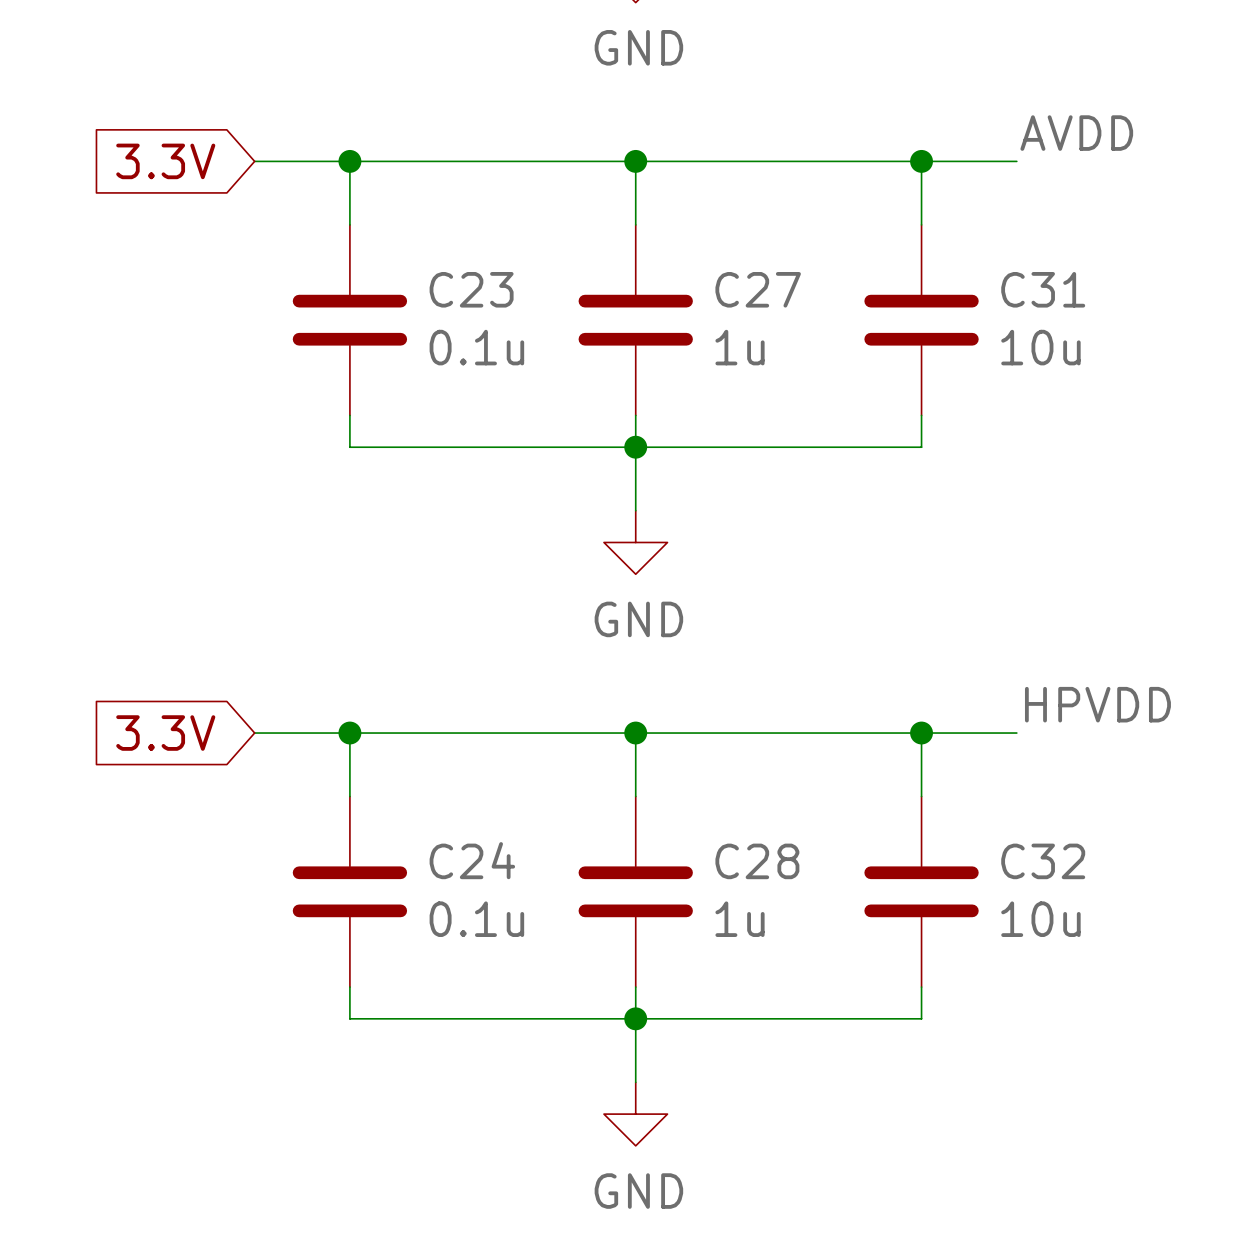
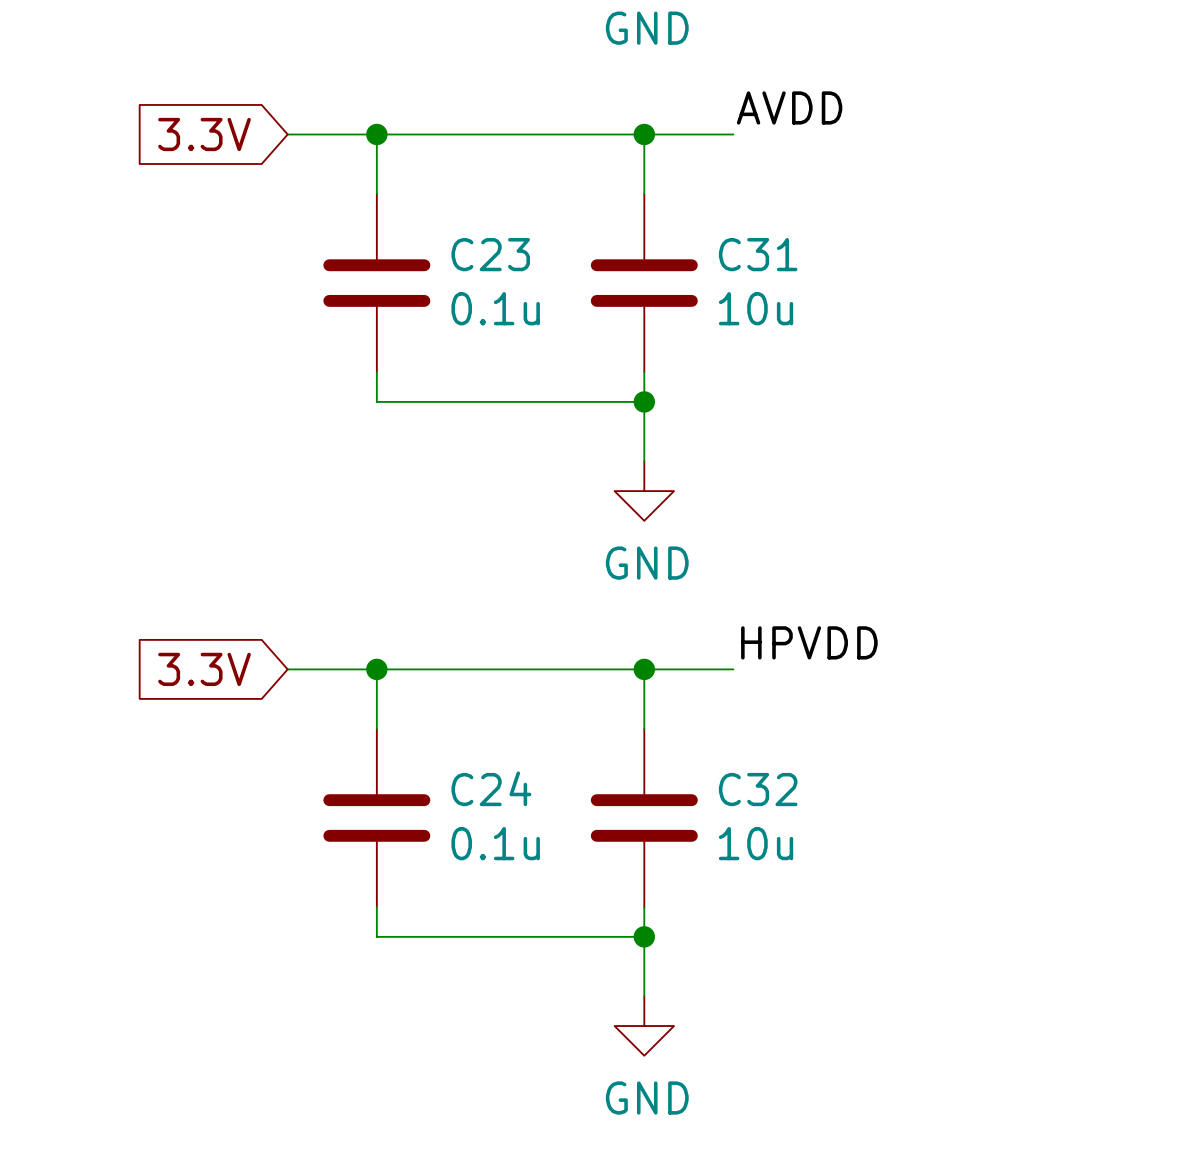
label position: AVDD (1076, 133) -> AVDD (789, 107)
wire: (731, 161) (1016, 161) -> none
wire: (921, 161) (921, 224) -> none
junction: (921, 161) -> none
C27 name: C27 (758, 289) -> C31 (758, 254)
C31: 10u (921, 320) -> none
C27 value: 1u (740, 347) -> 10u (756, 308)
wire: (921, 415) (921, 447) (635, 447) -> none
label position: HPVDD (1097, 704) -> HPVDD (809, 642)
wire: (731, 733) (1016, 733) -> none
wire: (921, 733) (921, 796) -> none
junction: (921, 733) -> none
C28 name: C28 (757, 861) -> C32 (758, 789)
C32: 10u (921, 891) -> none
C28 value: 1u (740, 919) -> 10u (756, 843)
wire: (921, 987) (921, 1018) (635, 1018) -> none

